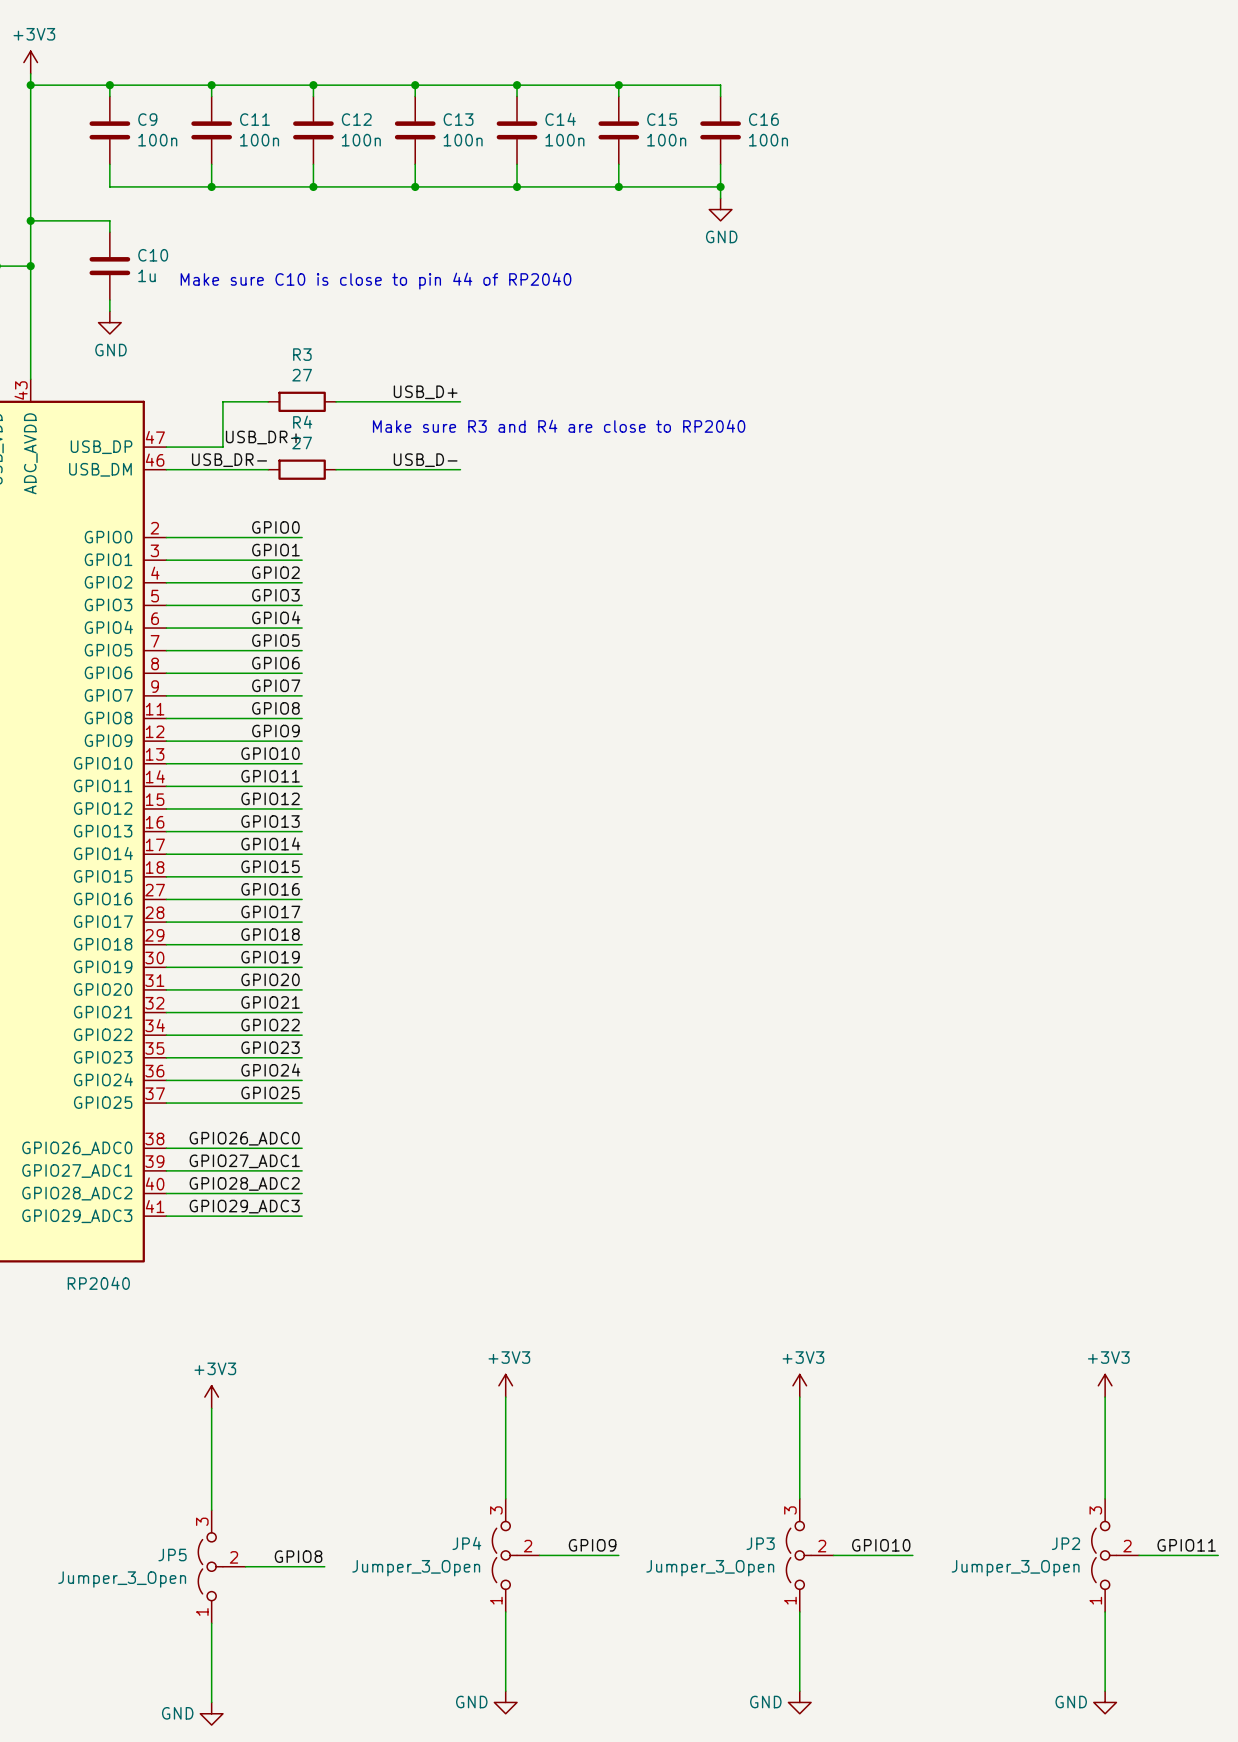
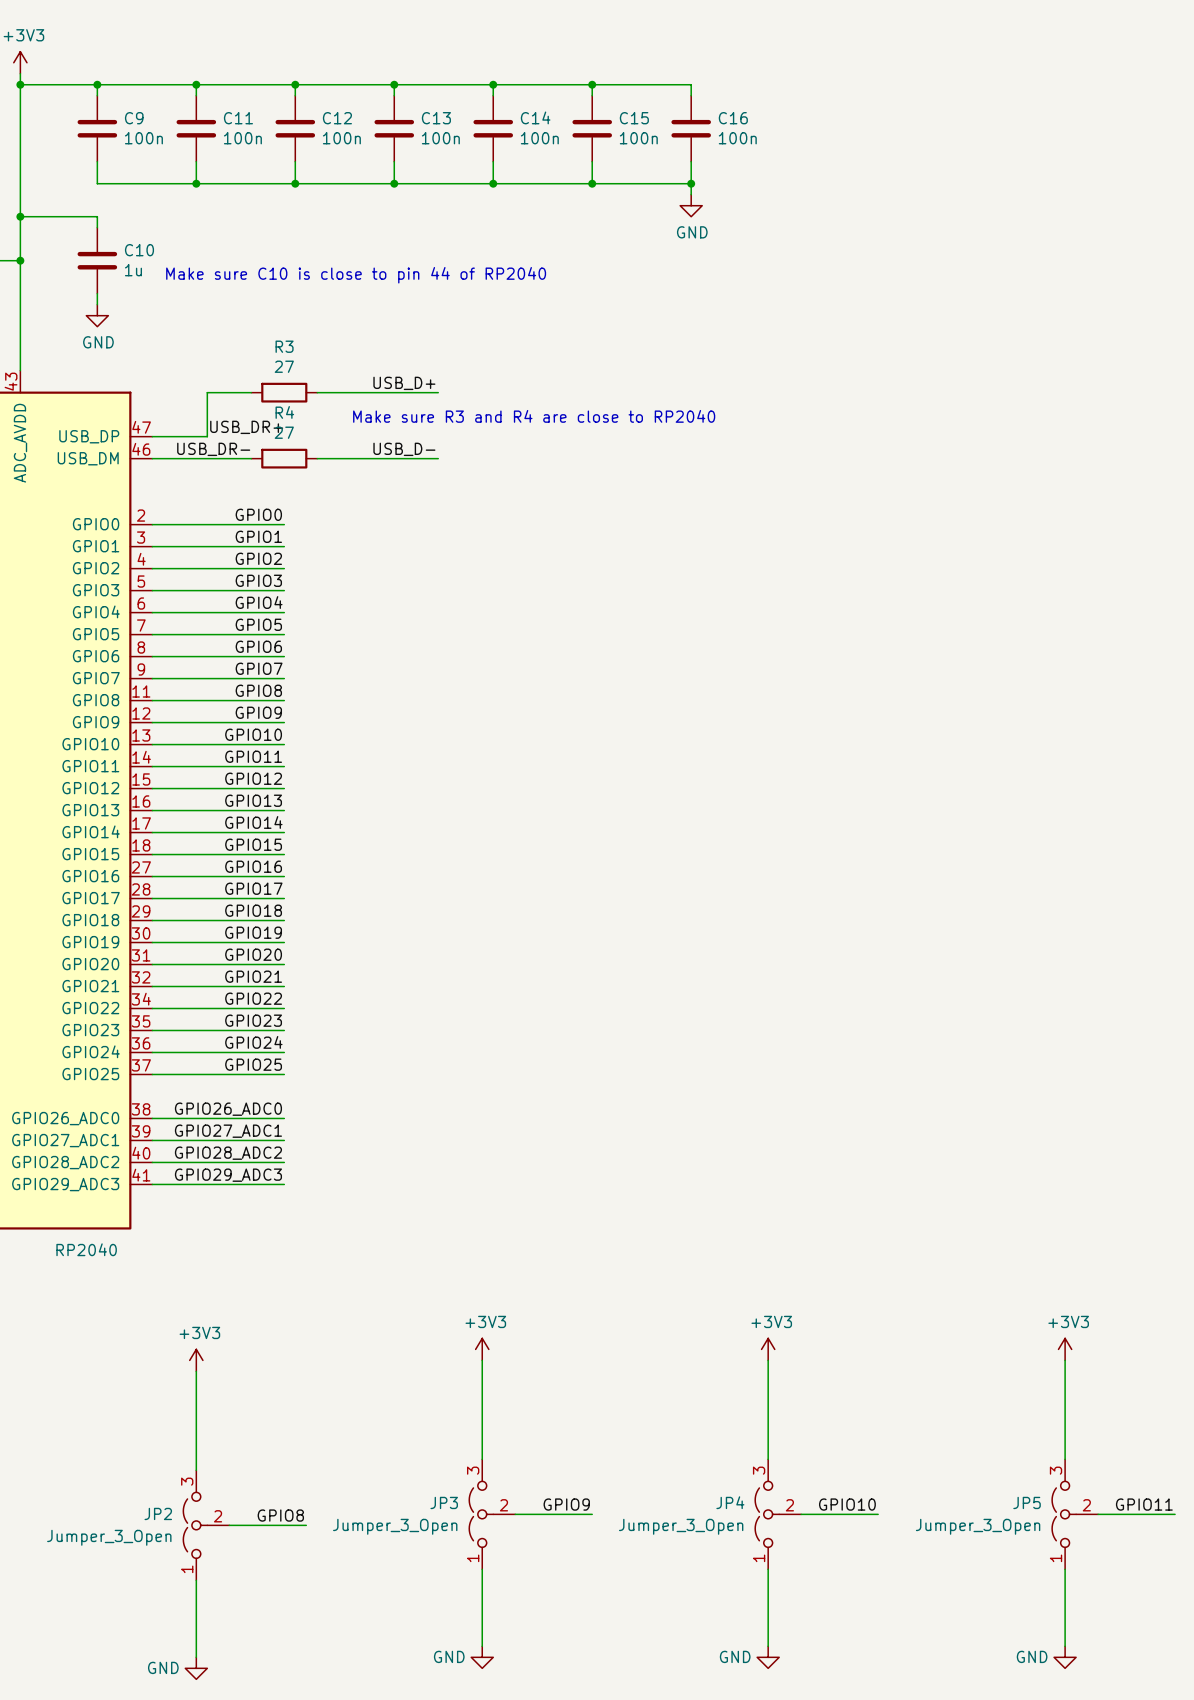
JP4 name: JP4 (466, 1543) -> JP3 (444, 1502)
JP3 name: JP3 (760, 1543) -> JP4 (730, 1502)
JP2 name: JP2 (1065, 1543) -> JP5 (1027, 1502)
JP5 name: JP5 (172, 1555) -> JP2 (158, 1513)

